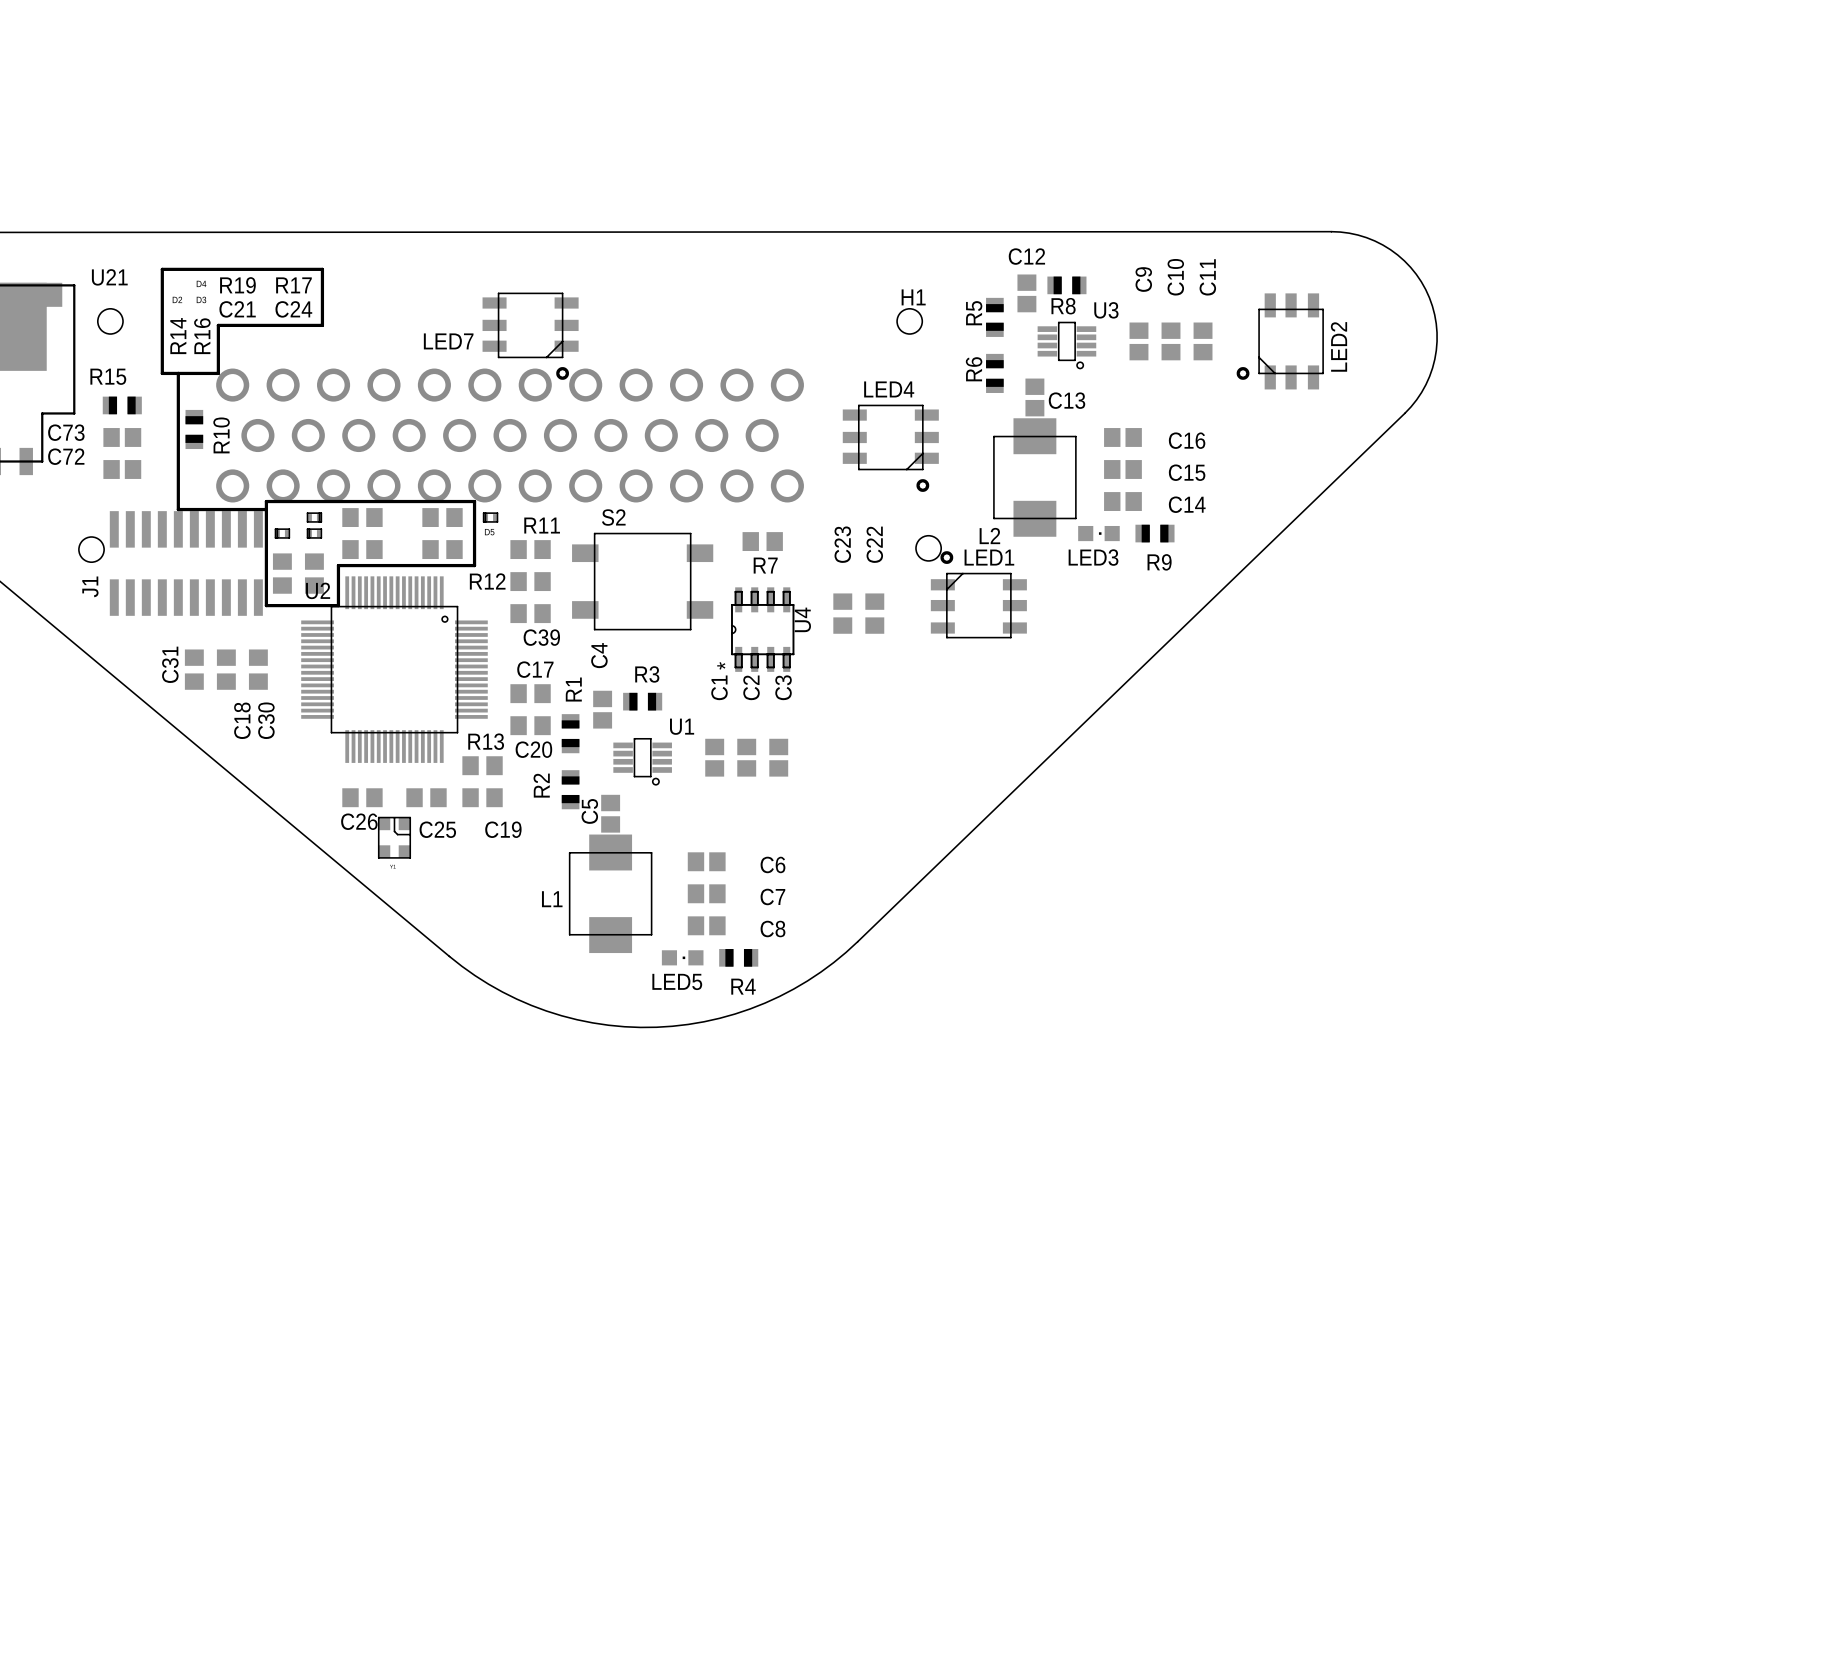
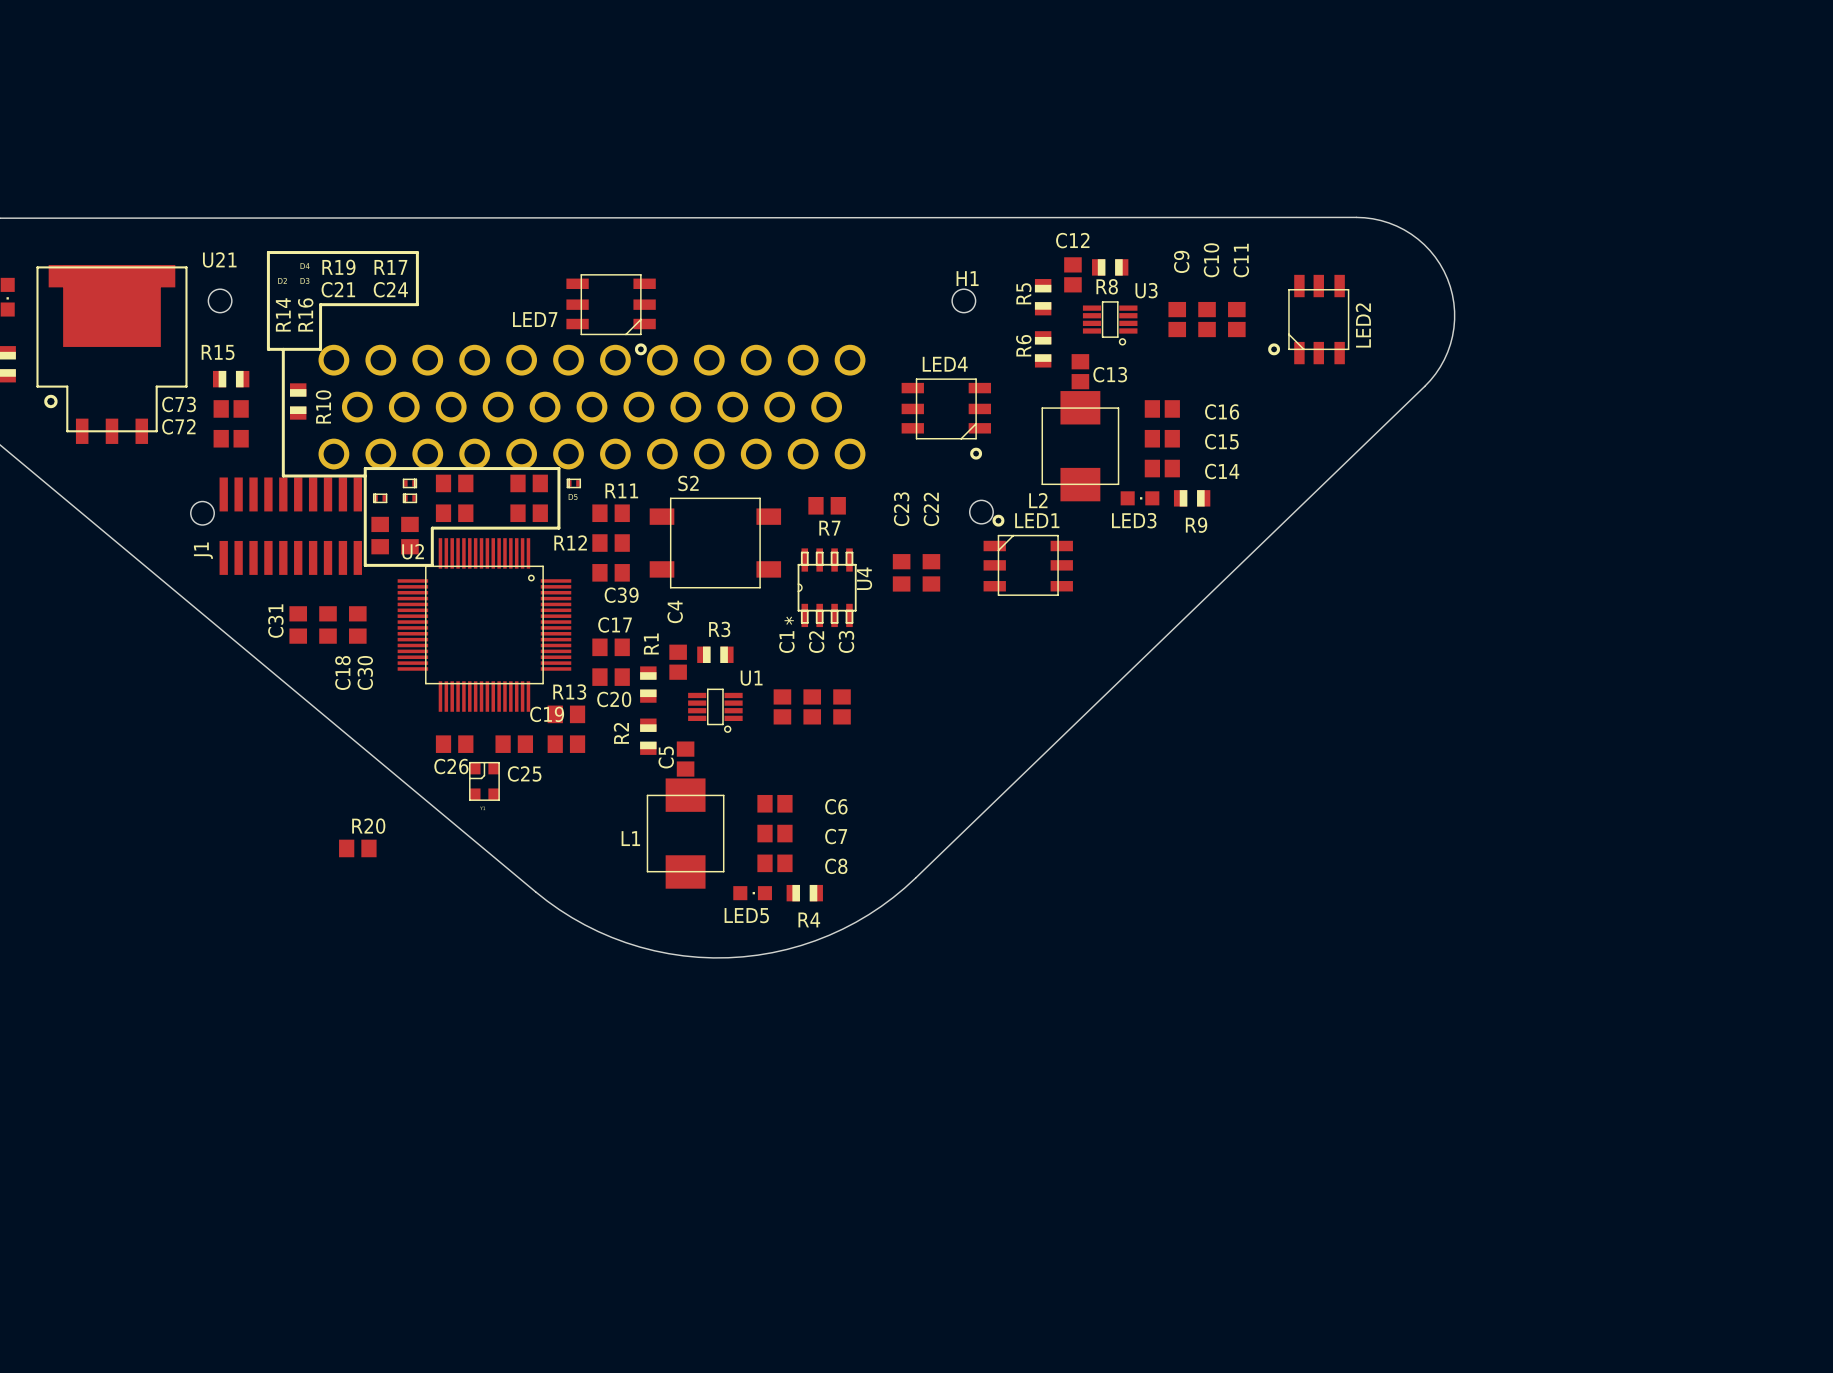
part footprint: [377, 816, 412, 859] -> [469, 761, 500, 801]
C19 name position: C19 (503, 829) -> C19 (547, 714)
R20: none -> (357, 848)

